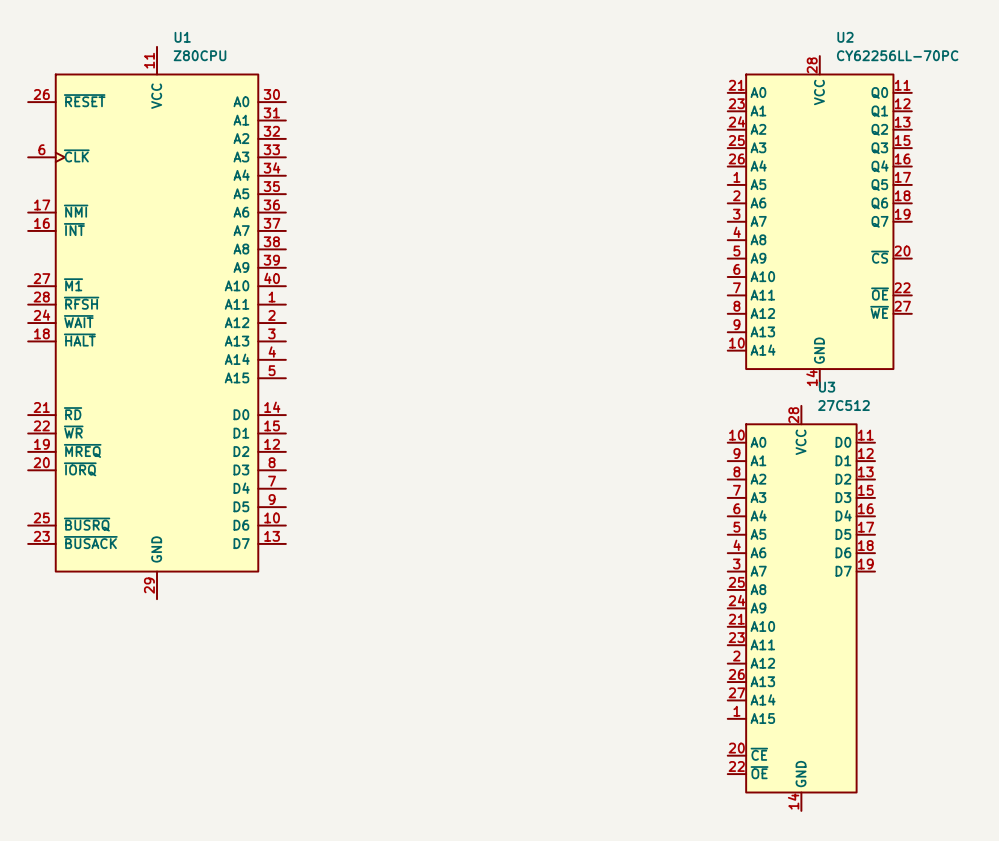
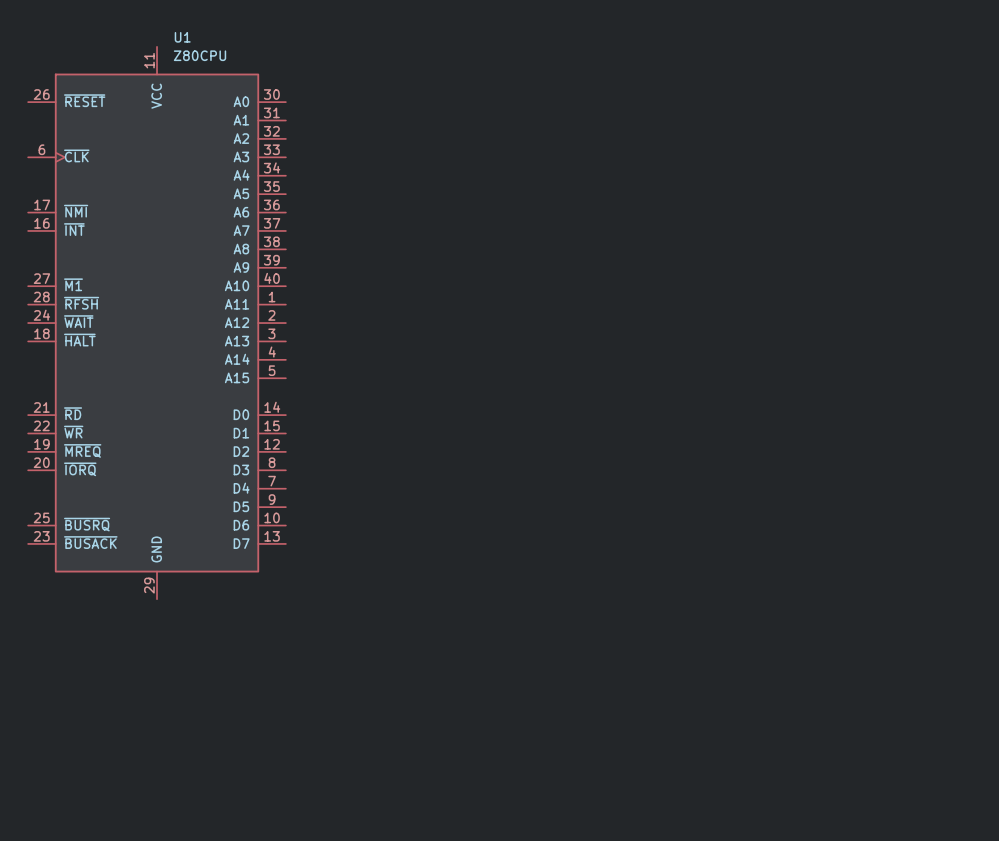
U2: CY62256LL-70PC (819, 221) -> none
U3: 27C512 (801, 608) -> none

